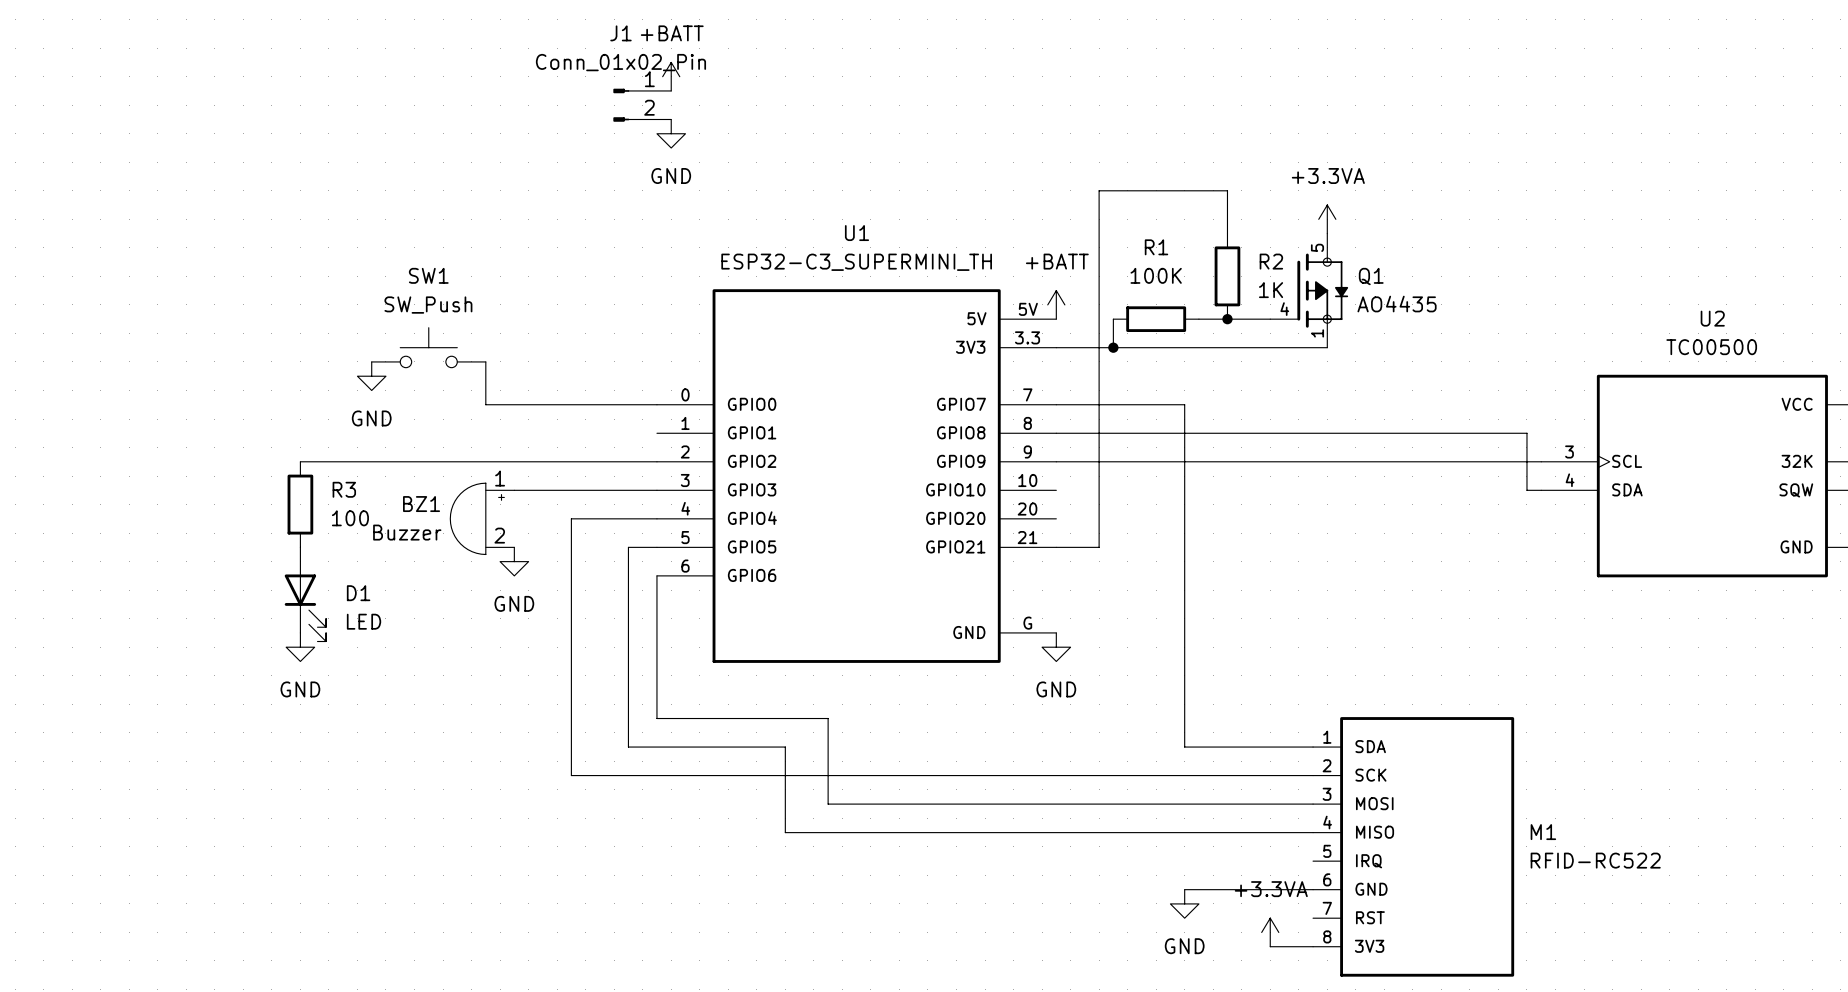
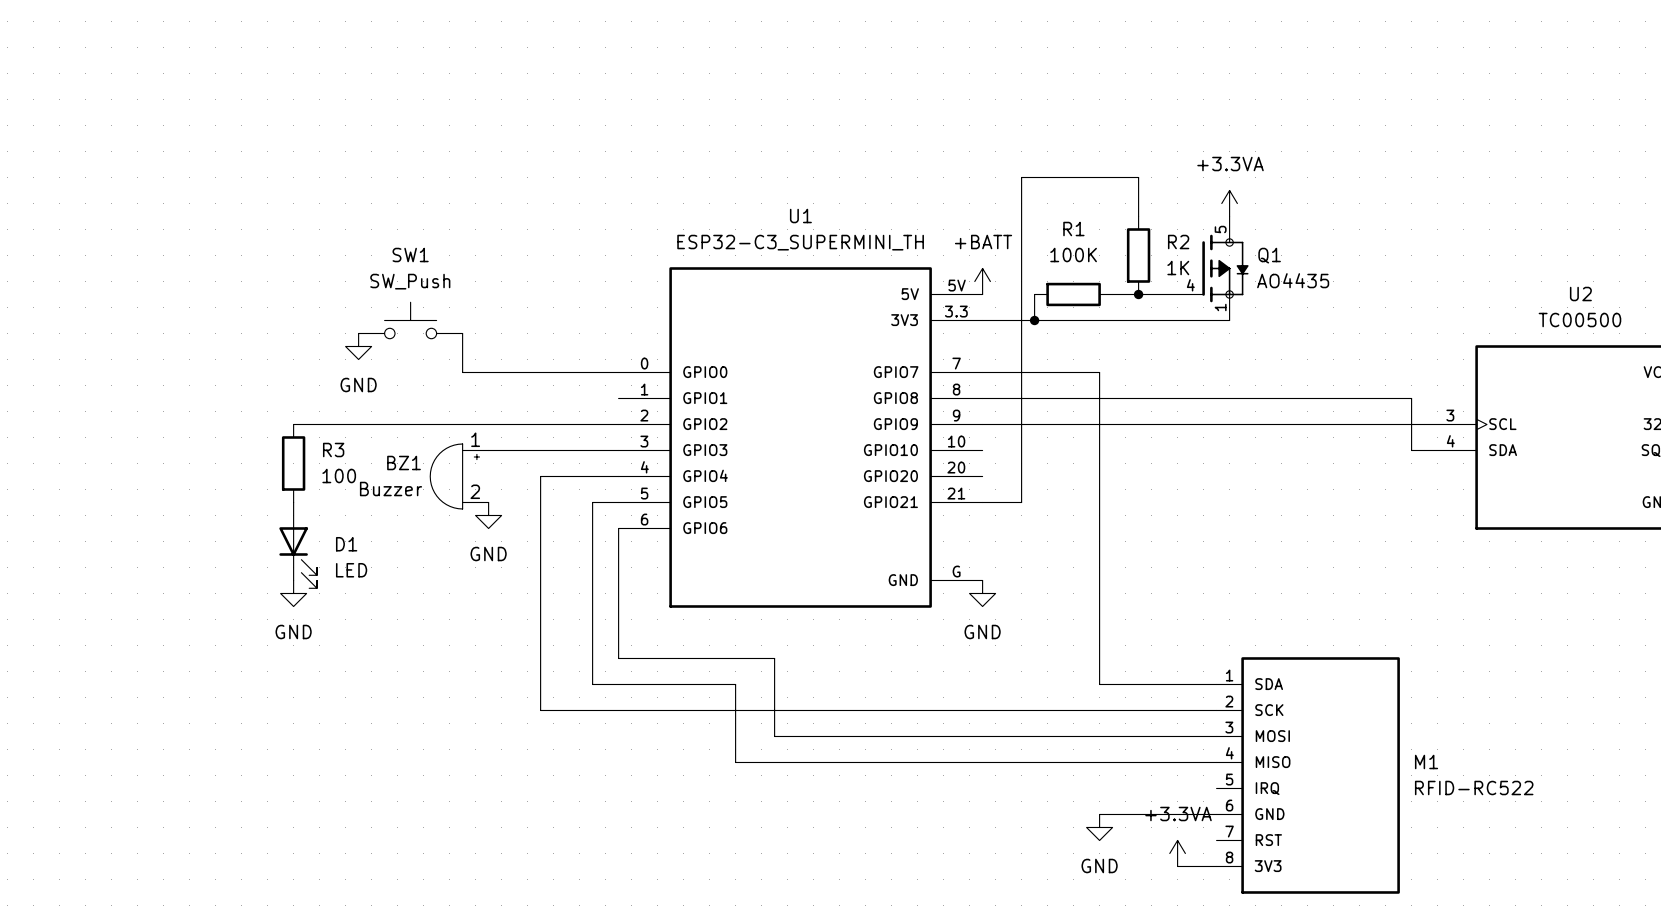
power symbol: +BATT (671, 76) -> none
J1: Conn_01x02_Pin (642, 105) -> none
power symbol: GND (671, 133) -> none

